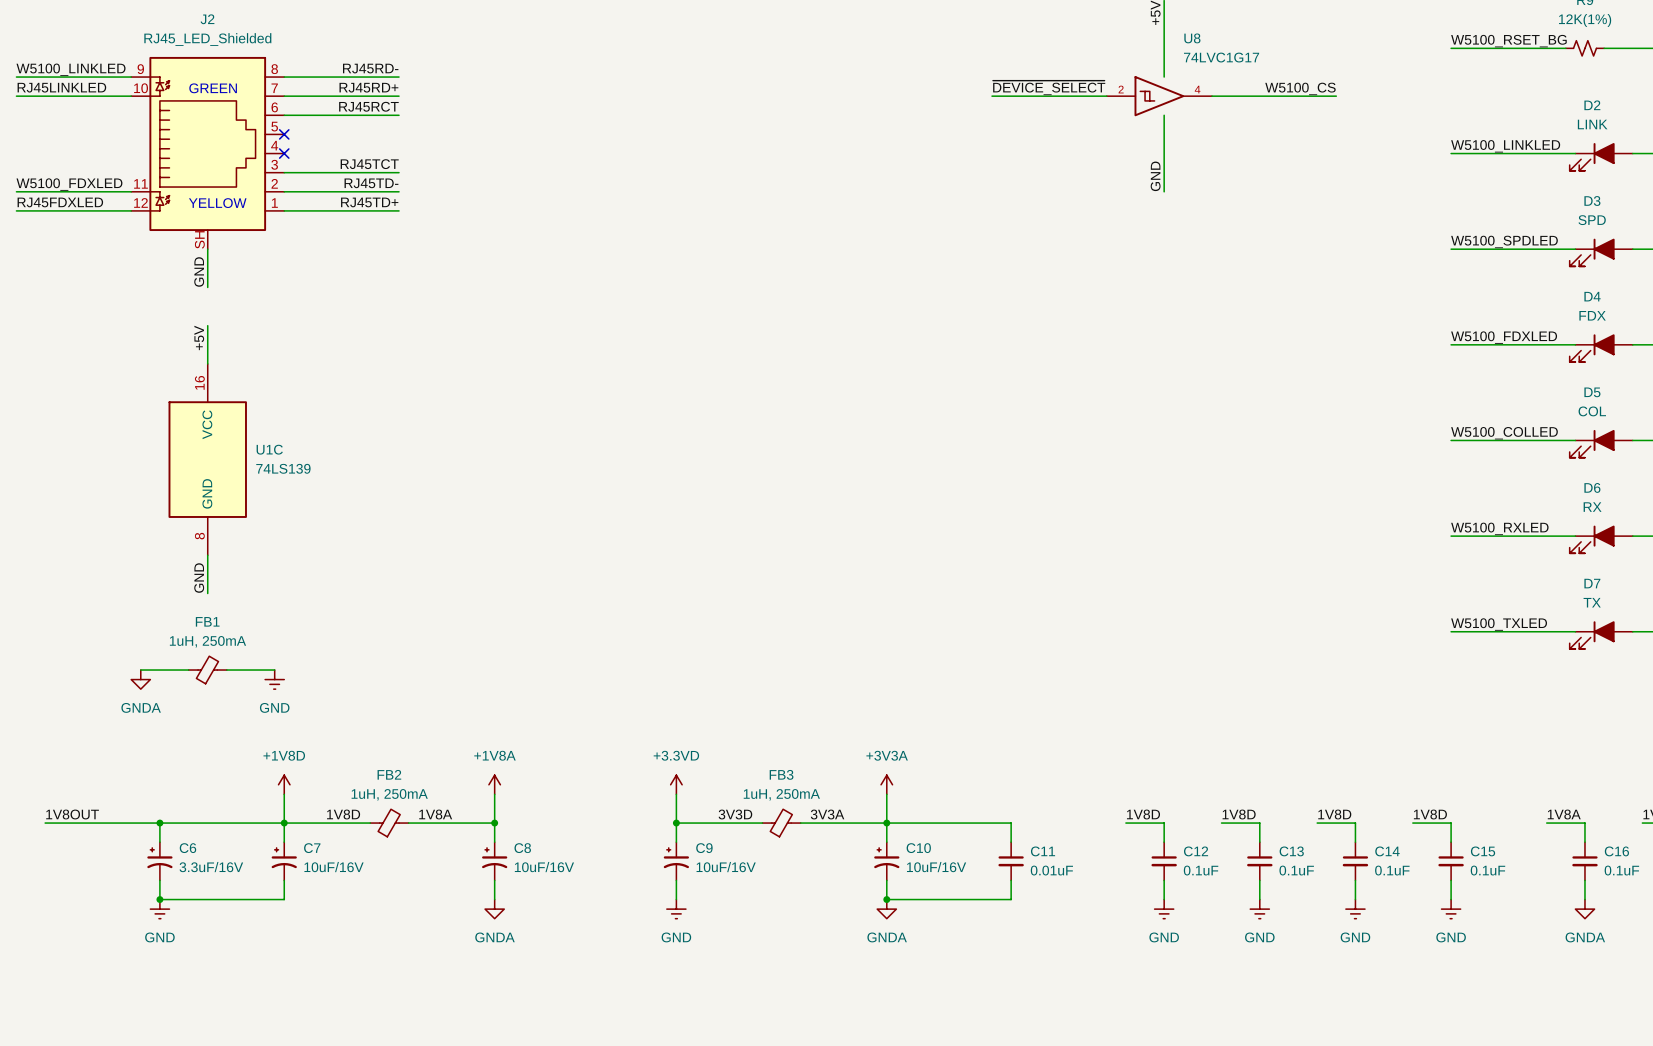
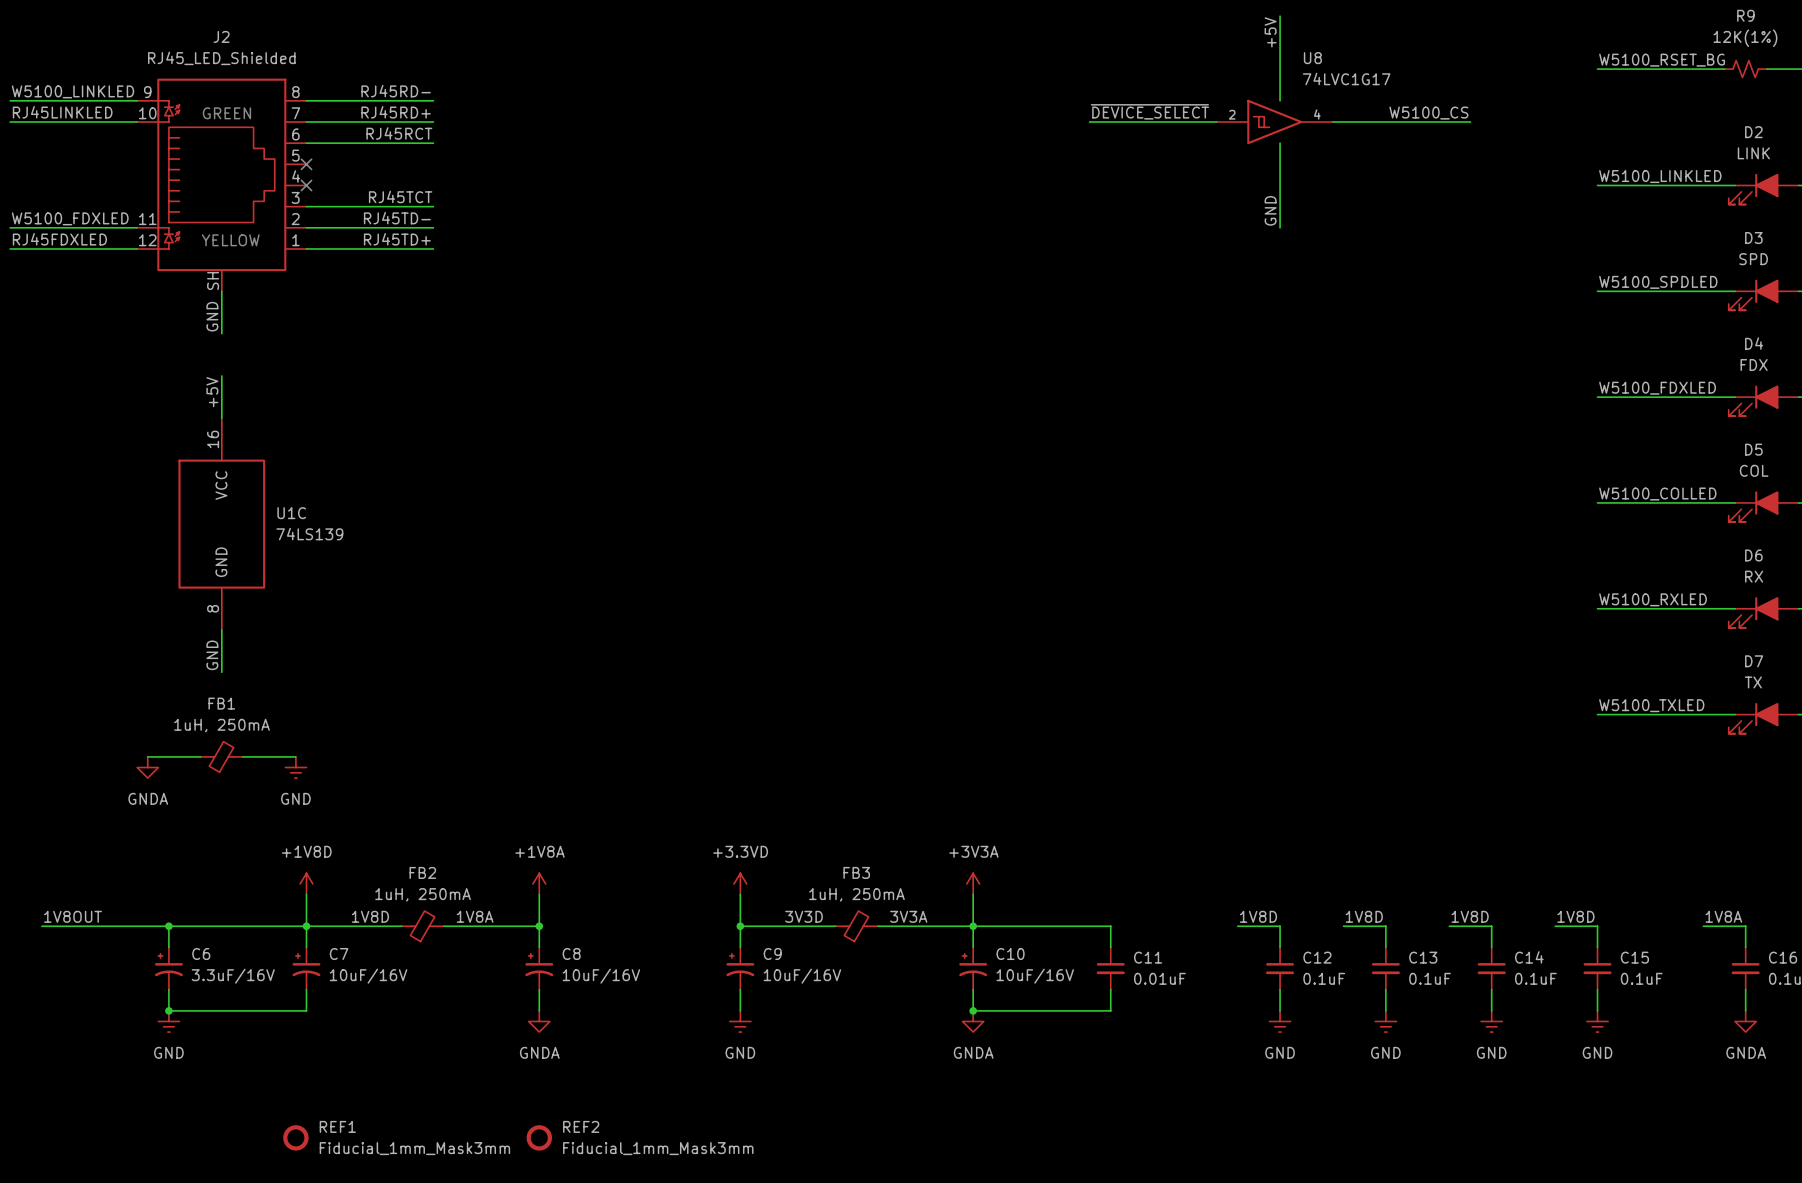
REF1: none -> Fiducial_1mm_Mask3mm (295, 1137)
REF2: none -> Fiducial_1mm_Mask3mm (539, 1137)

